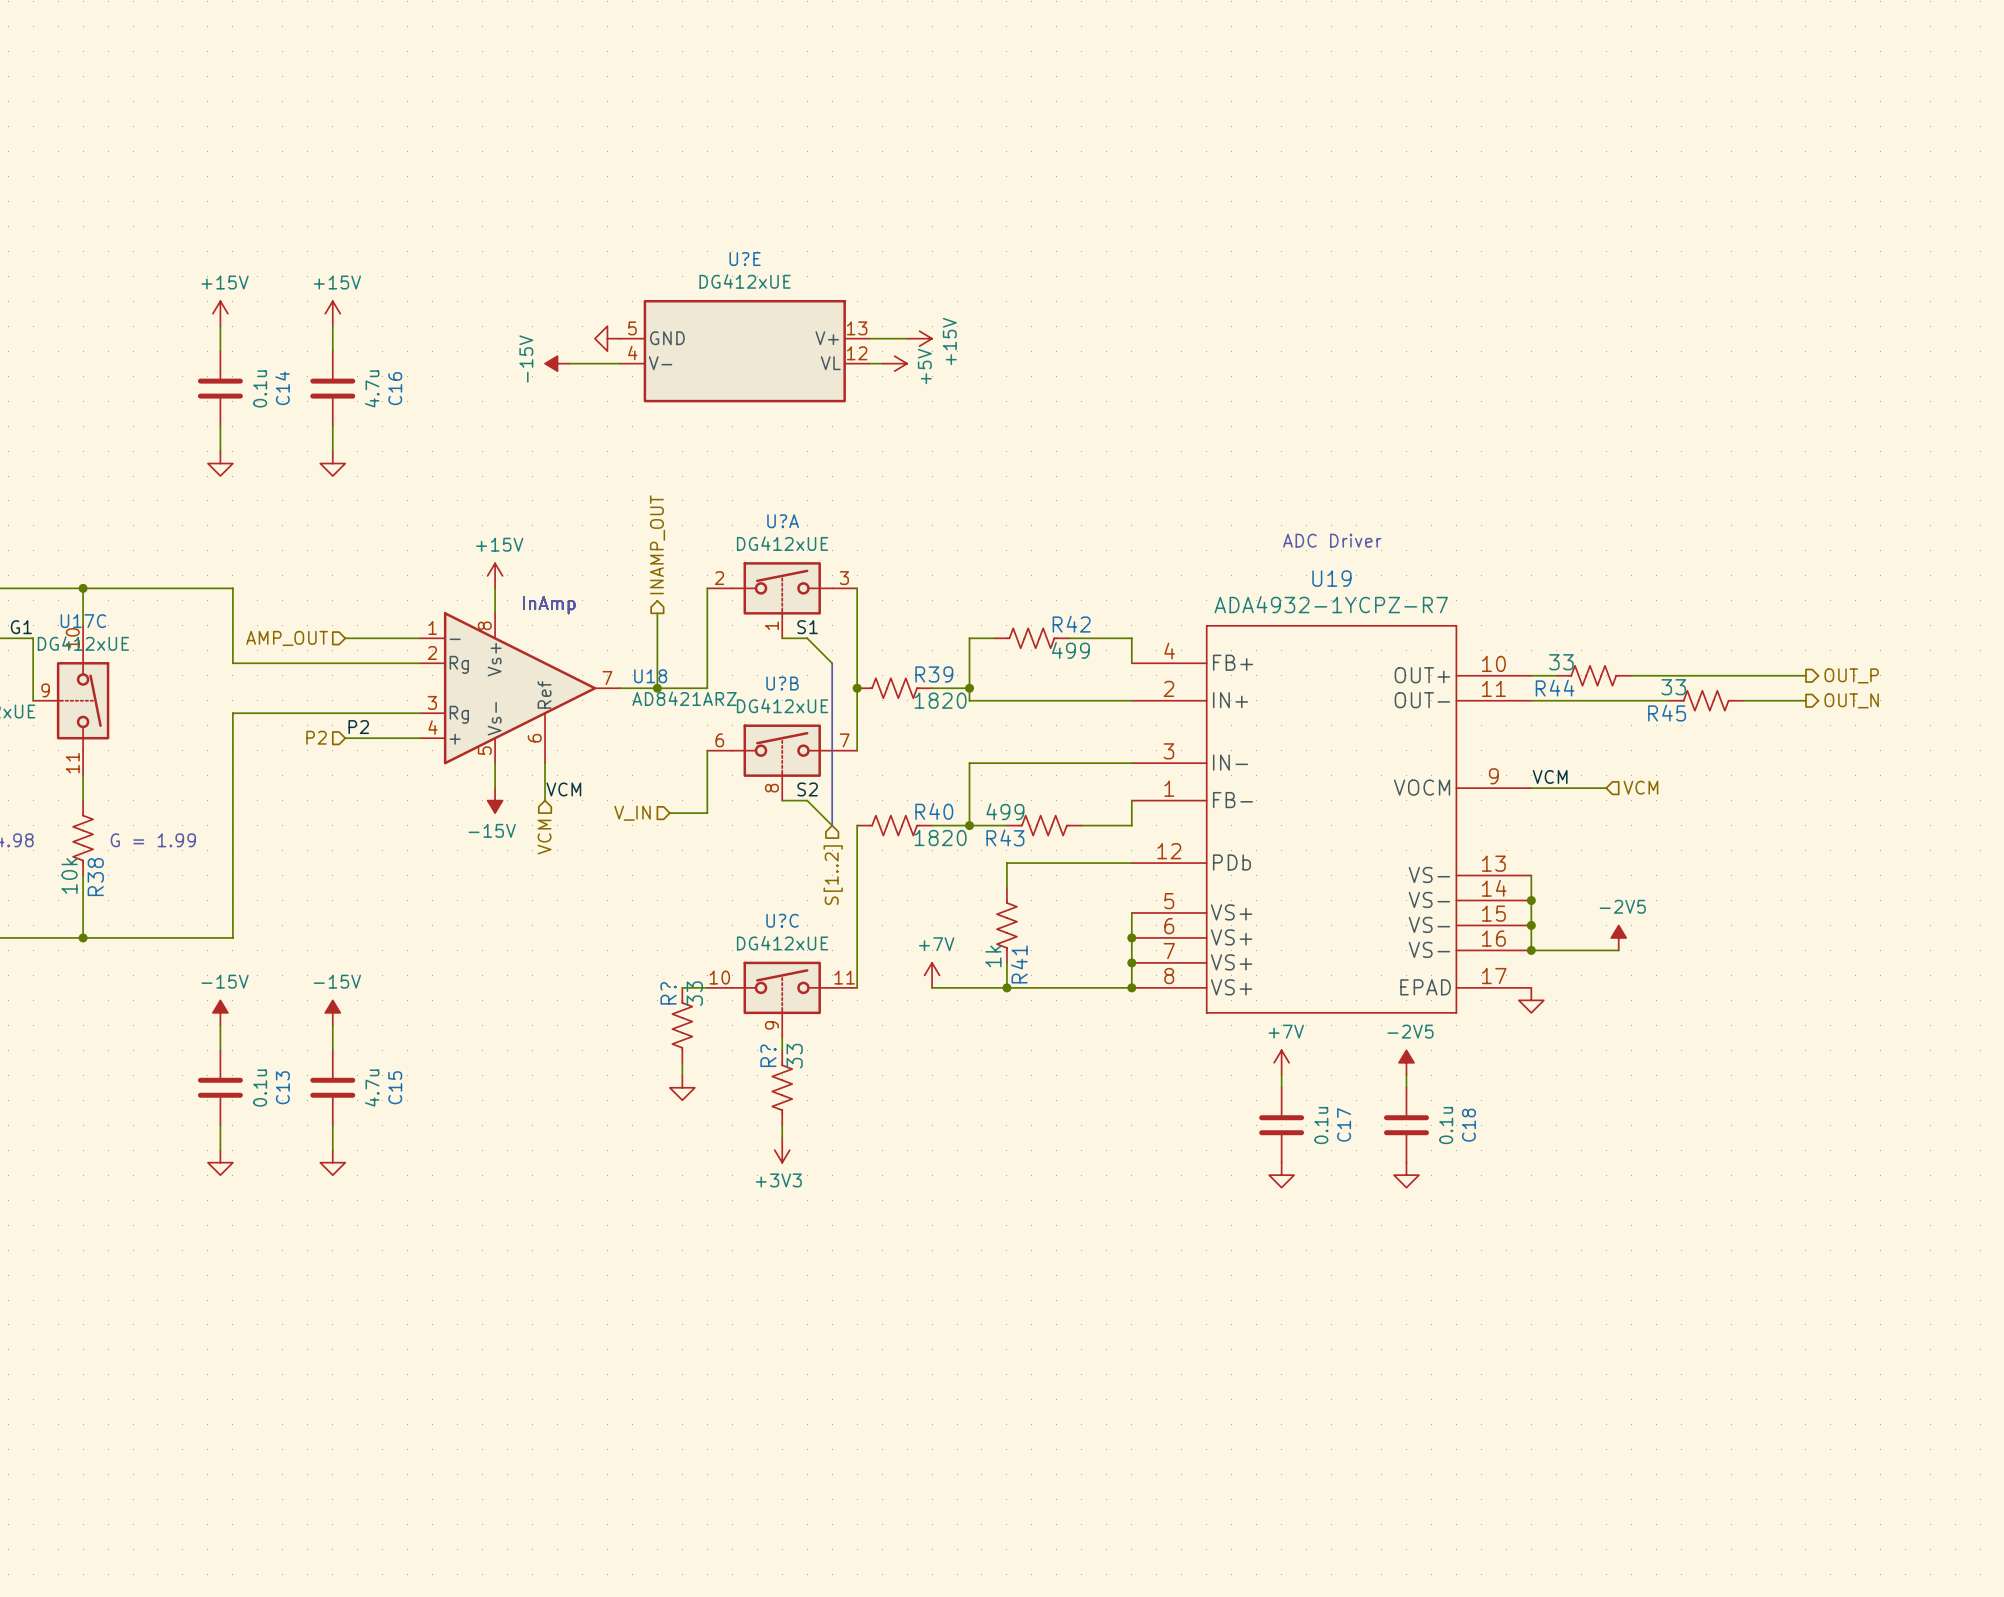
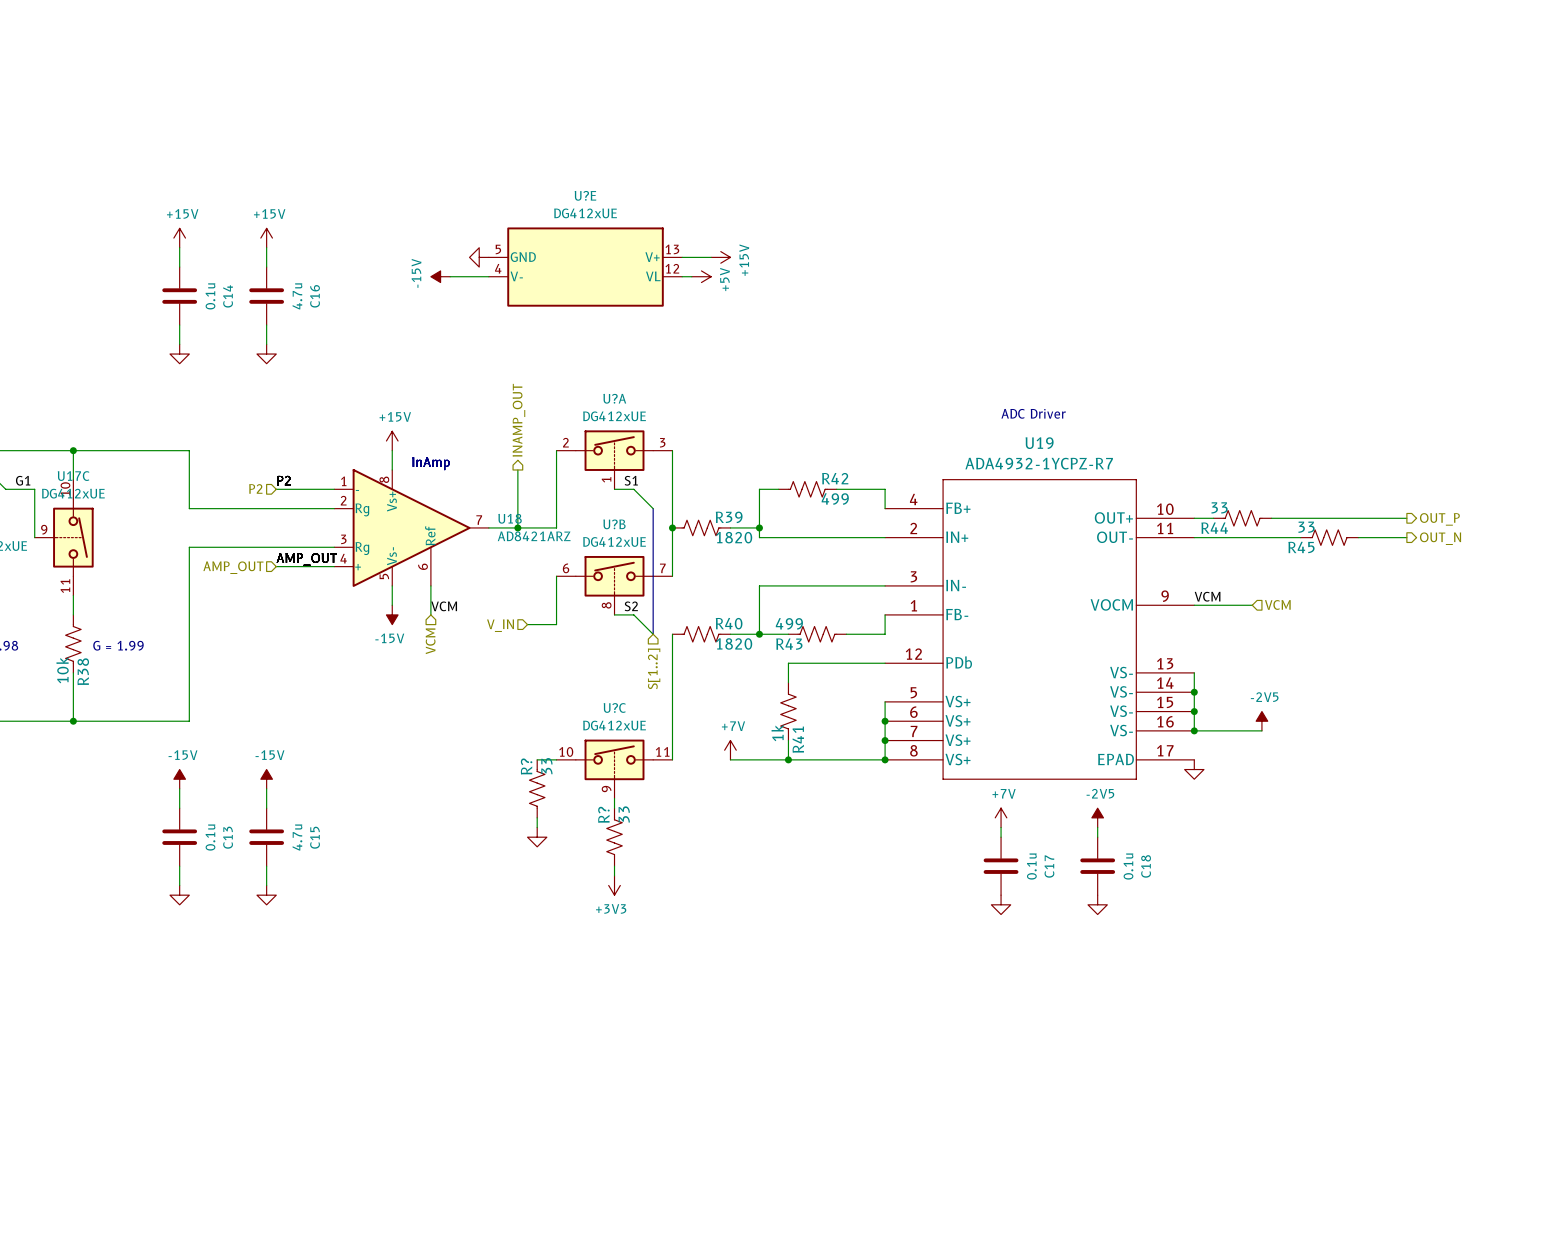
label: none -> P2 (283, 480)
hierarchical label: AMP_OUT (287, 638) -> P2 (255, 488)
label: P2 (358, 727) -> AMP_OUT (306, 559)
hierarchical label: P2 (316, 737) -> AMP_OUT (233, 567)

